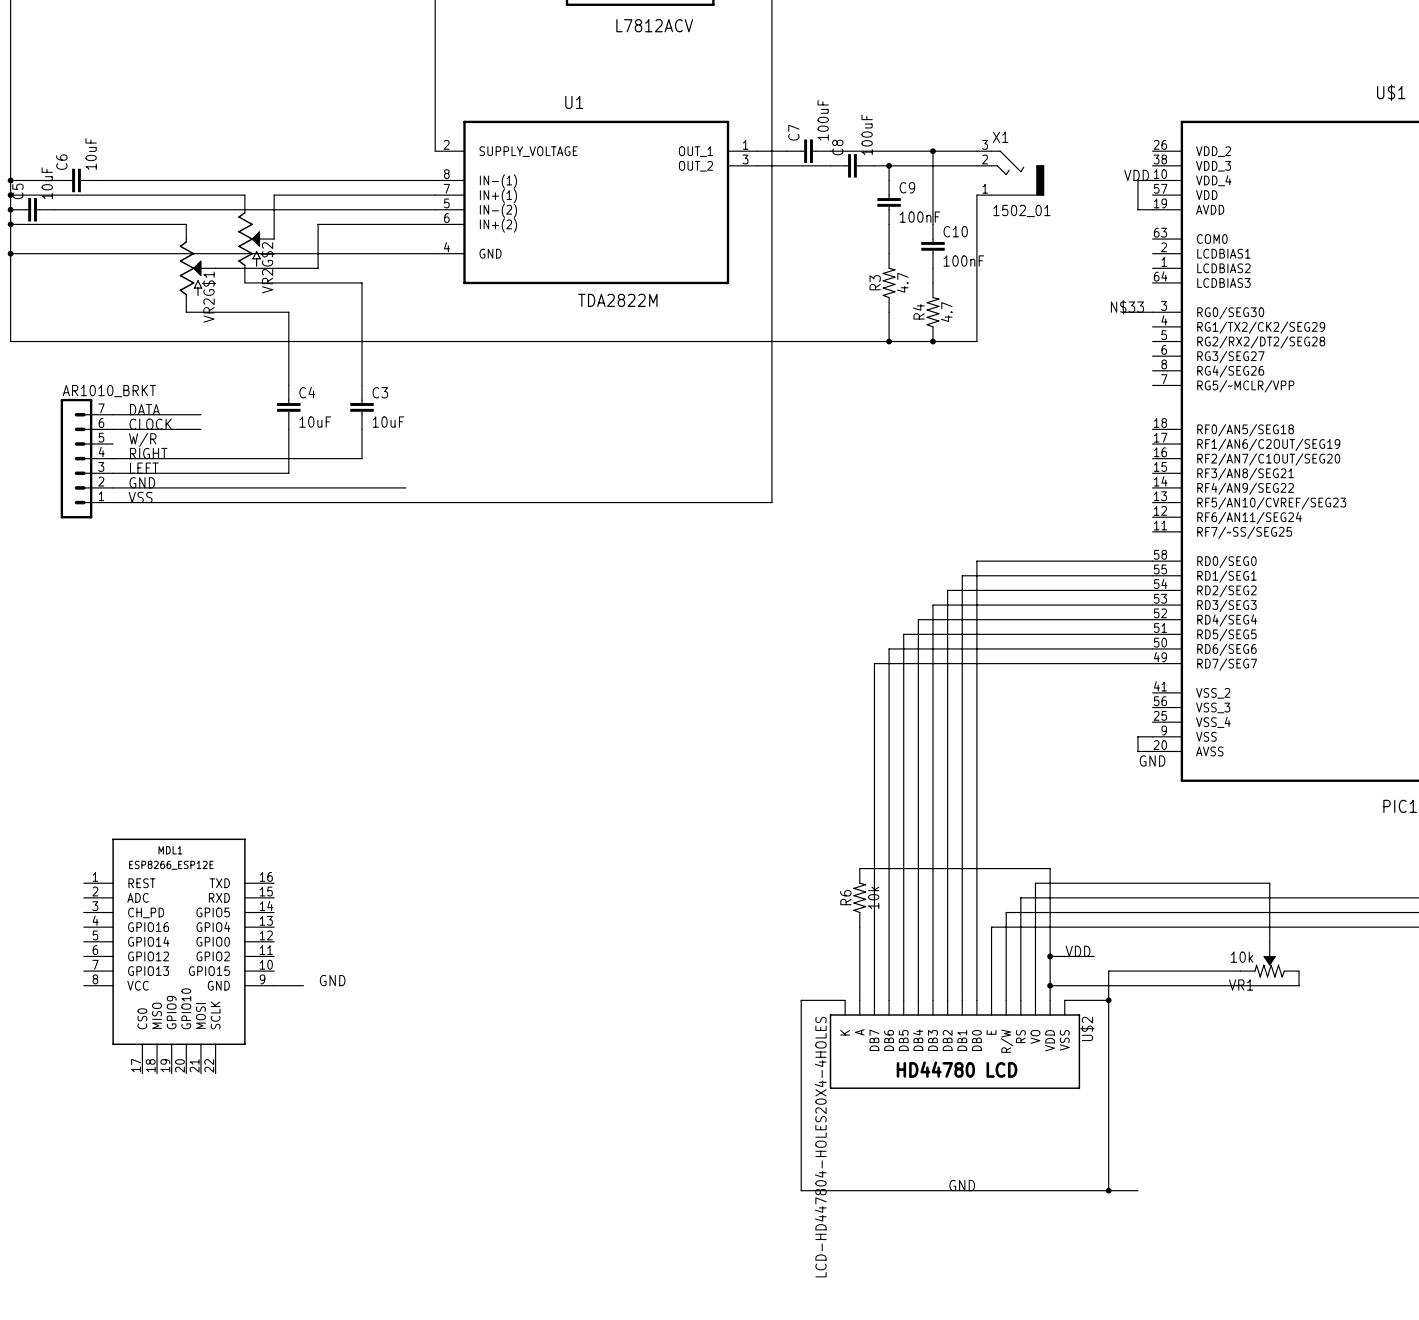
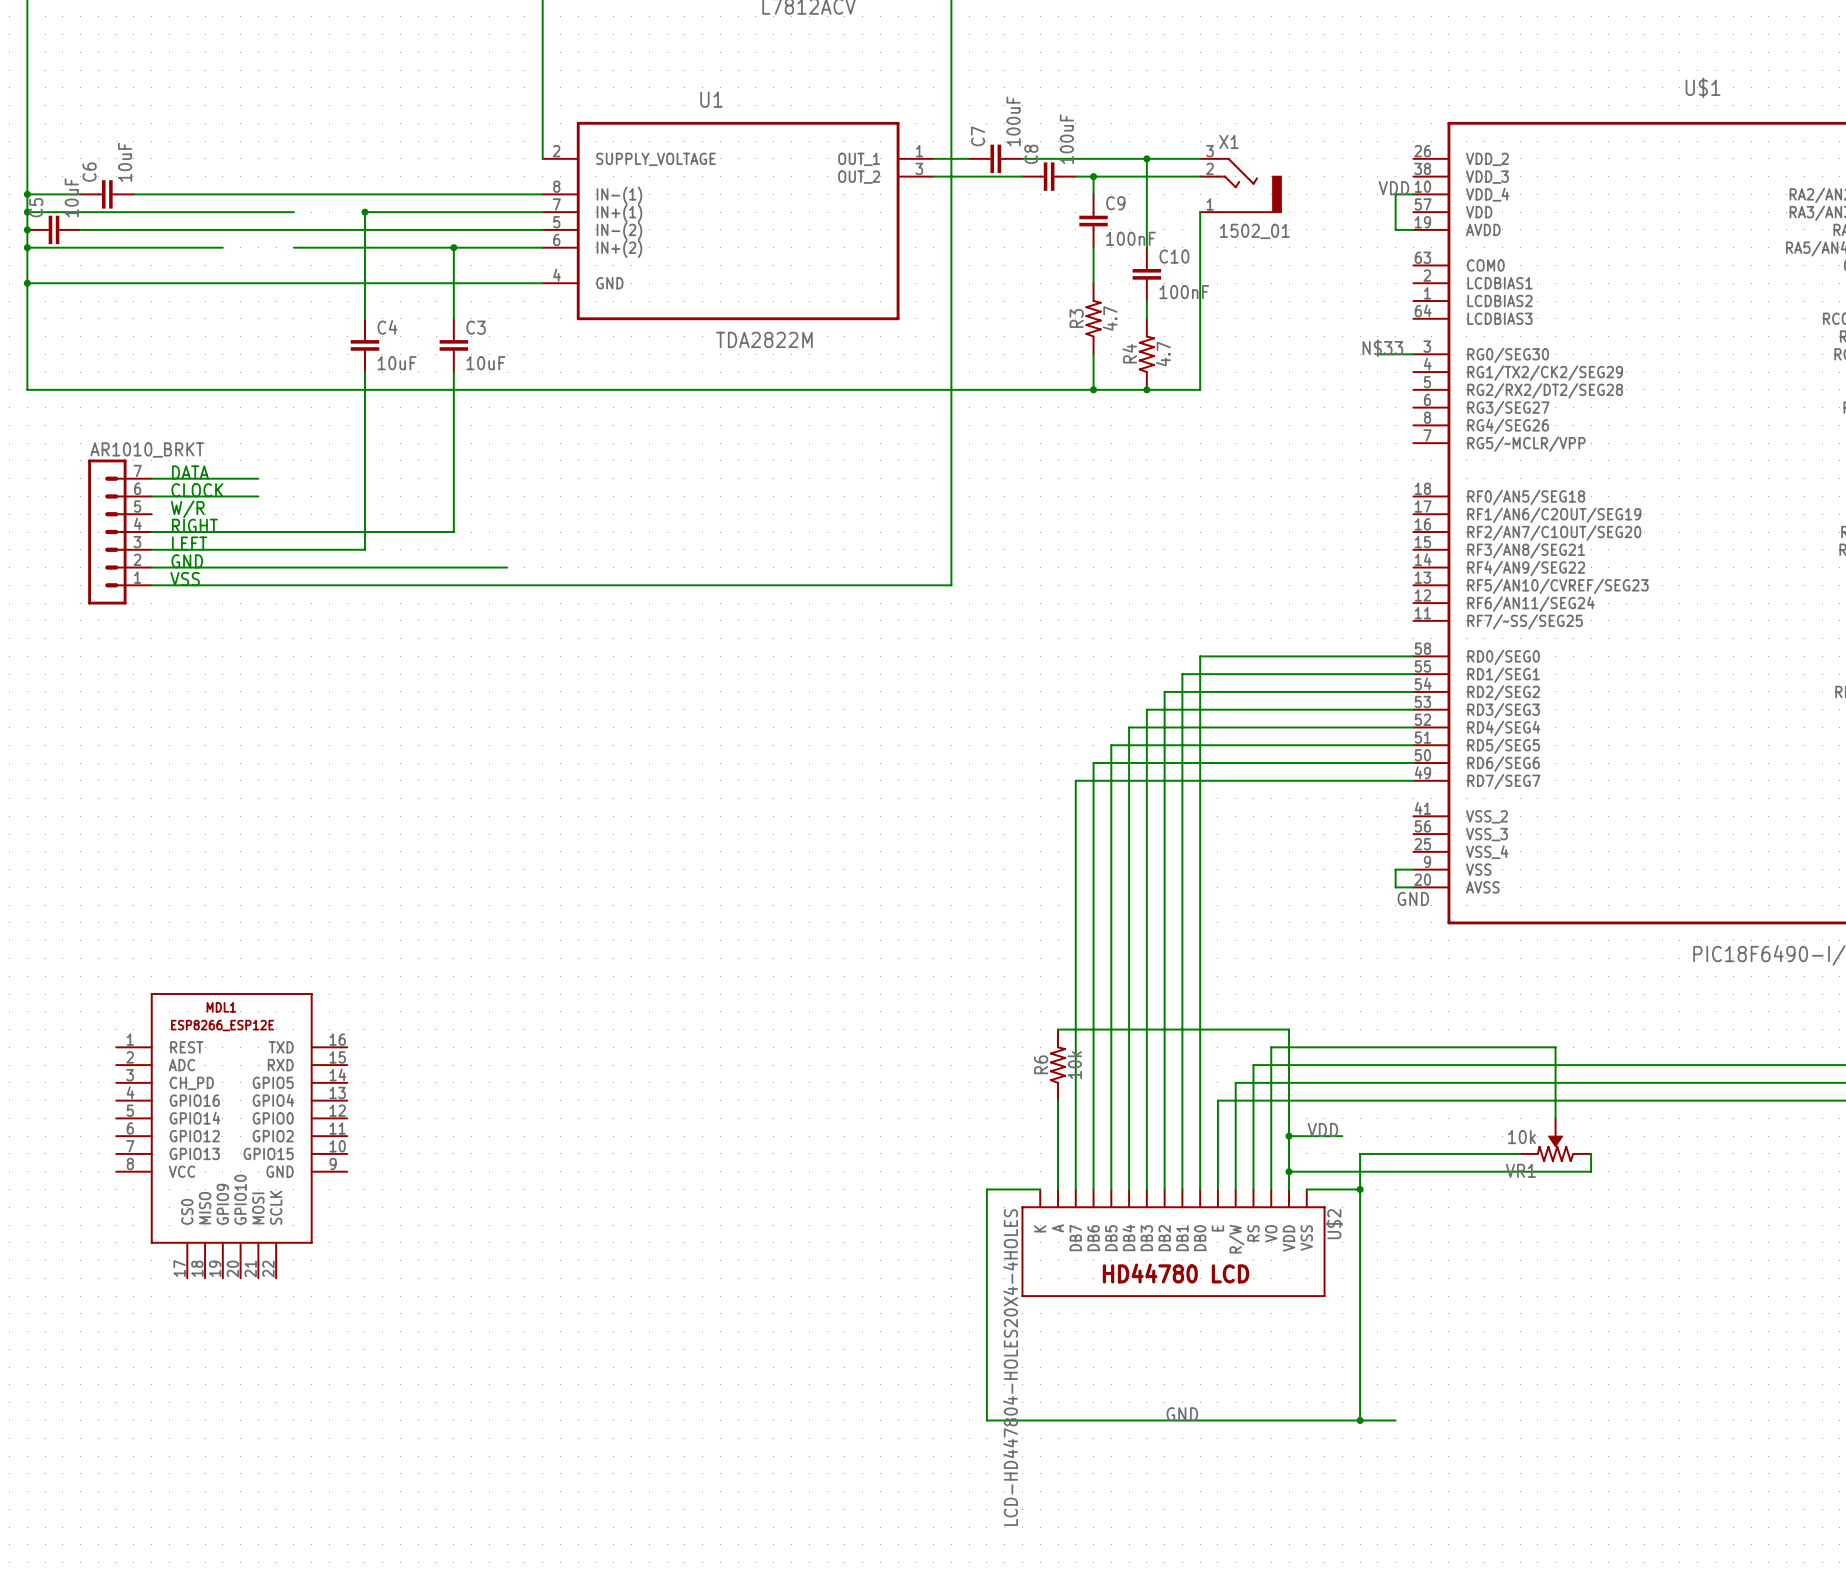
wire: (230, 195) (244, 195) -> none
wire: (288, 195) (274, 195) (274, 239) -> (364, 212) (364, 318)
junction: none -> (364, 212)
wire: (171, 224) (186, 224) -> none
wire: (318, 224) (318, 268) (215, 268) -> (400, 247) (293, 247)
wire: none -> (453, 247) (453, 318)
junction: none -> (453, 247)
VR2G$2: (256, 239) -> none
VR2G$1: (197, 268) -> none
wire: (244, 282) (362, 282) (362, 326) -> none
wire: (186, 312) (288, 312) (288, 326) -> none
C4 position: (288, 407) -> (364, 345)
C3 position: (362, 407) -> (453, 345)
label: GND (332, 980) -> none
wire: (274, 985) (303, 985) -> none

